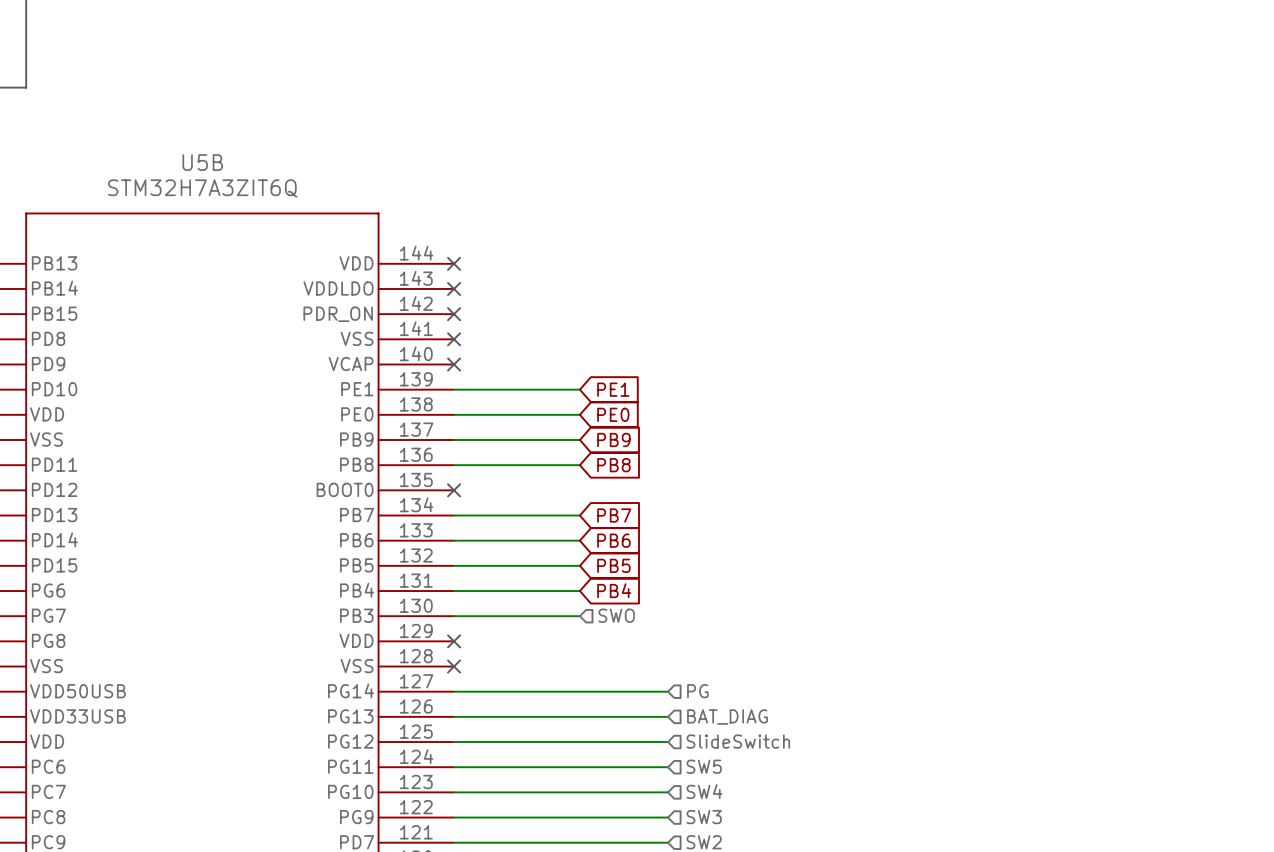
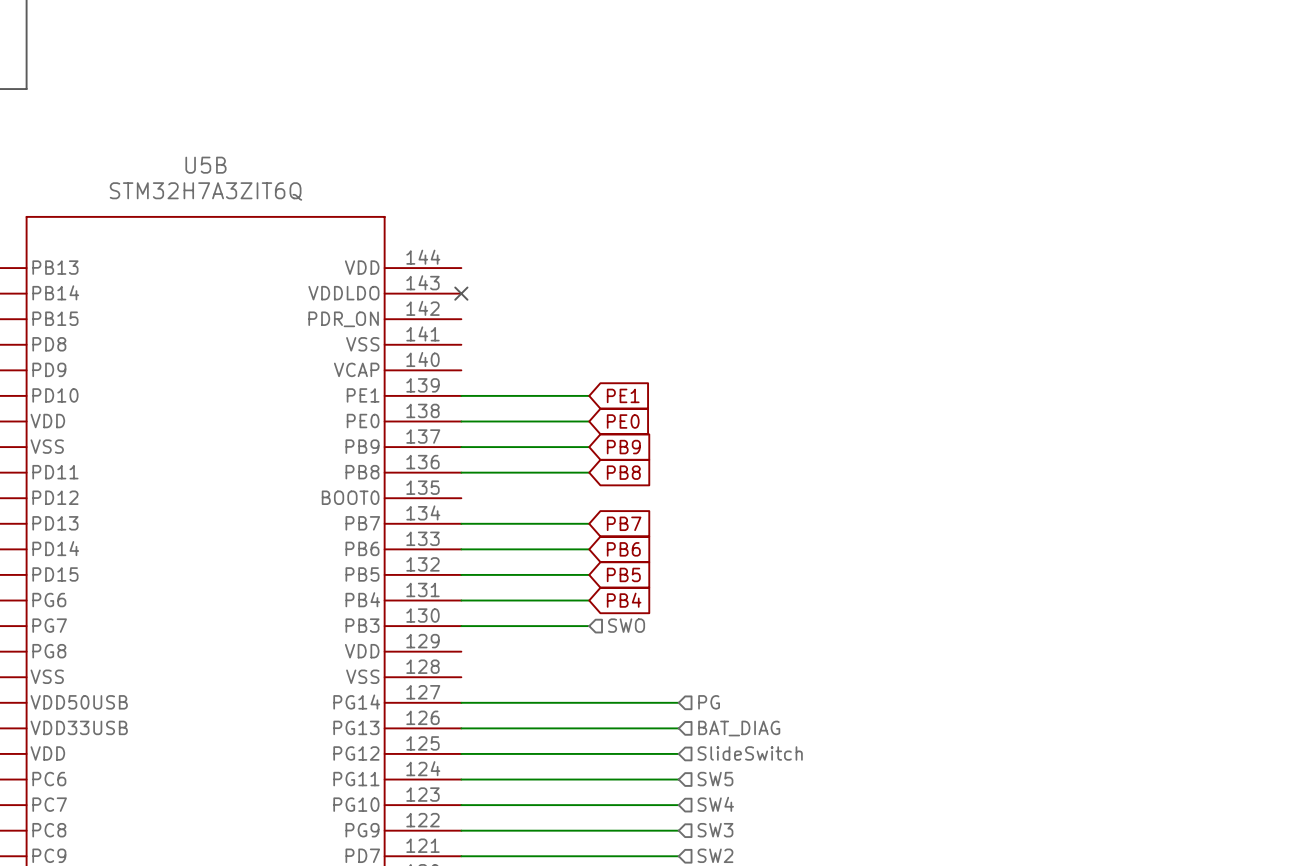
no-connect mark: (454, 263) -> none
no-connect mark: (454, 314) -> none
no-connect mark: (454, 339) -> none
no-connect mark: (454, 364) -> none
no-connect mark: (454, 490) -> none
no-connect mark: (454, 641) -> none
no-connect mark: (454, 666) -> none

